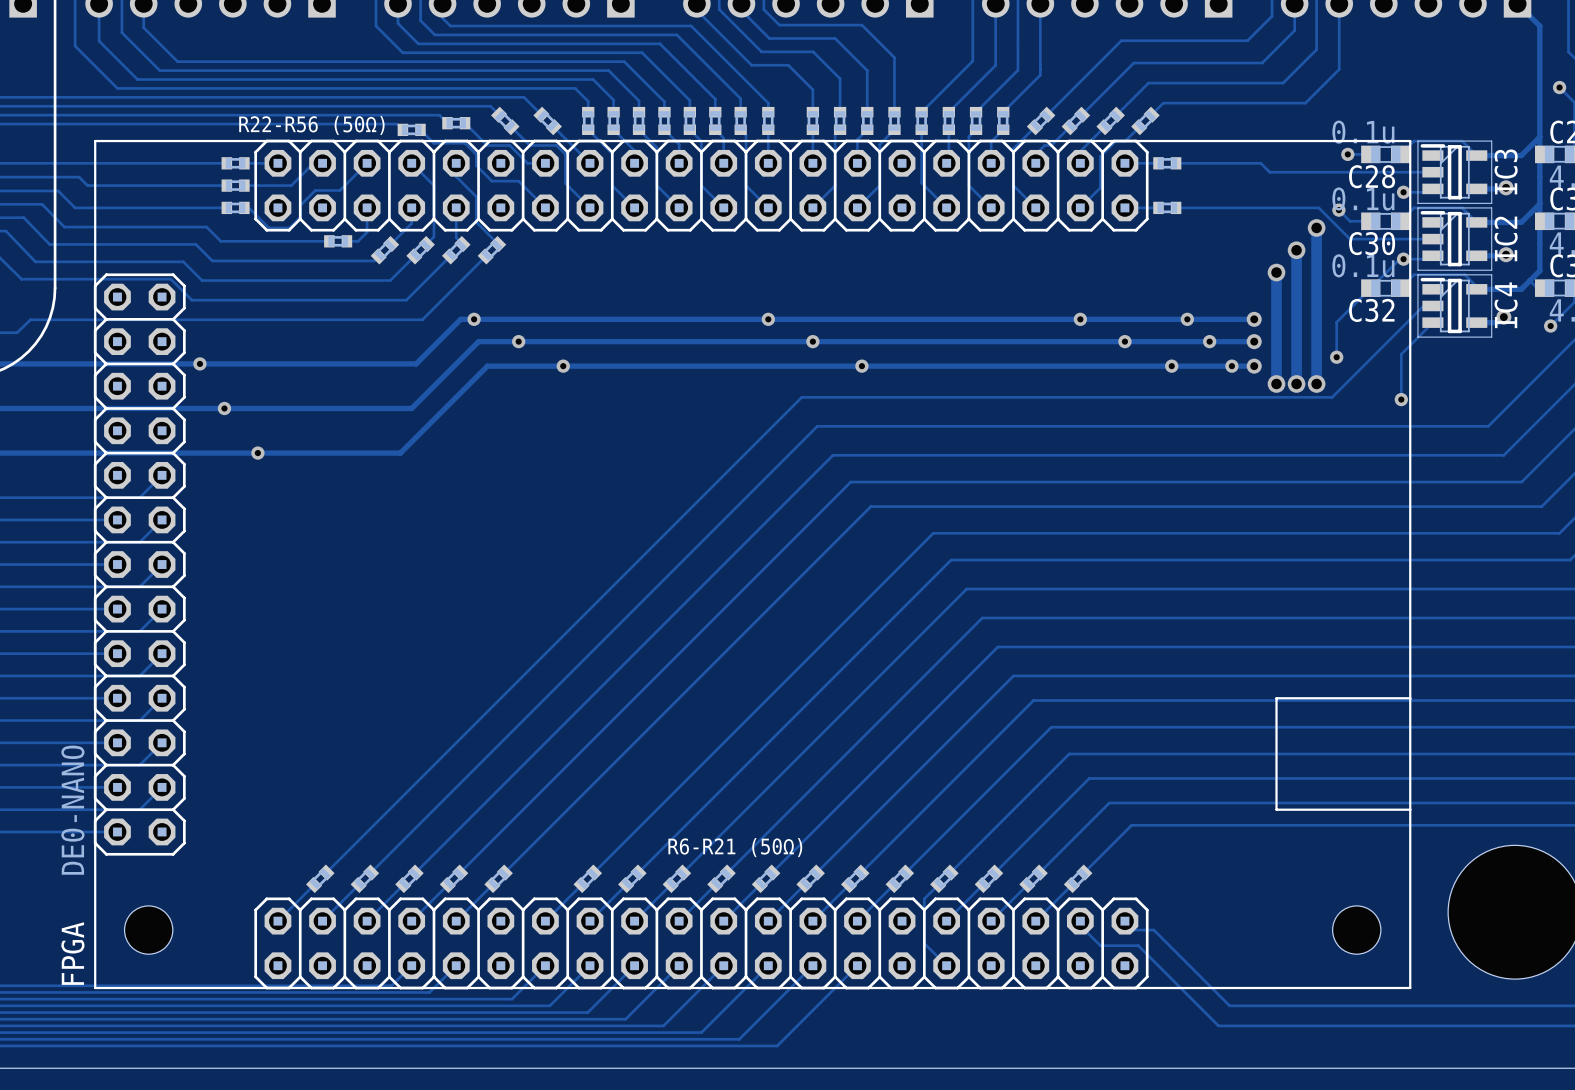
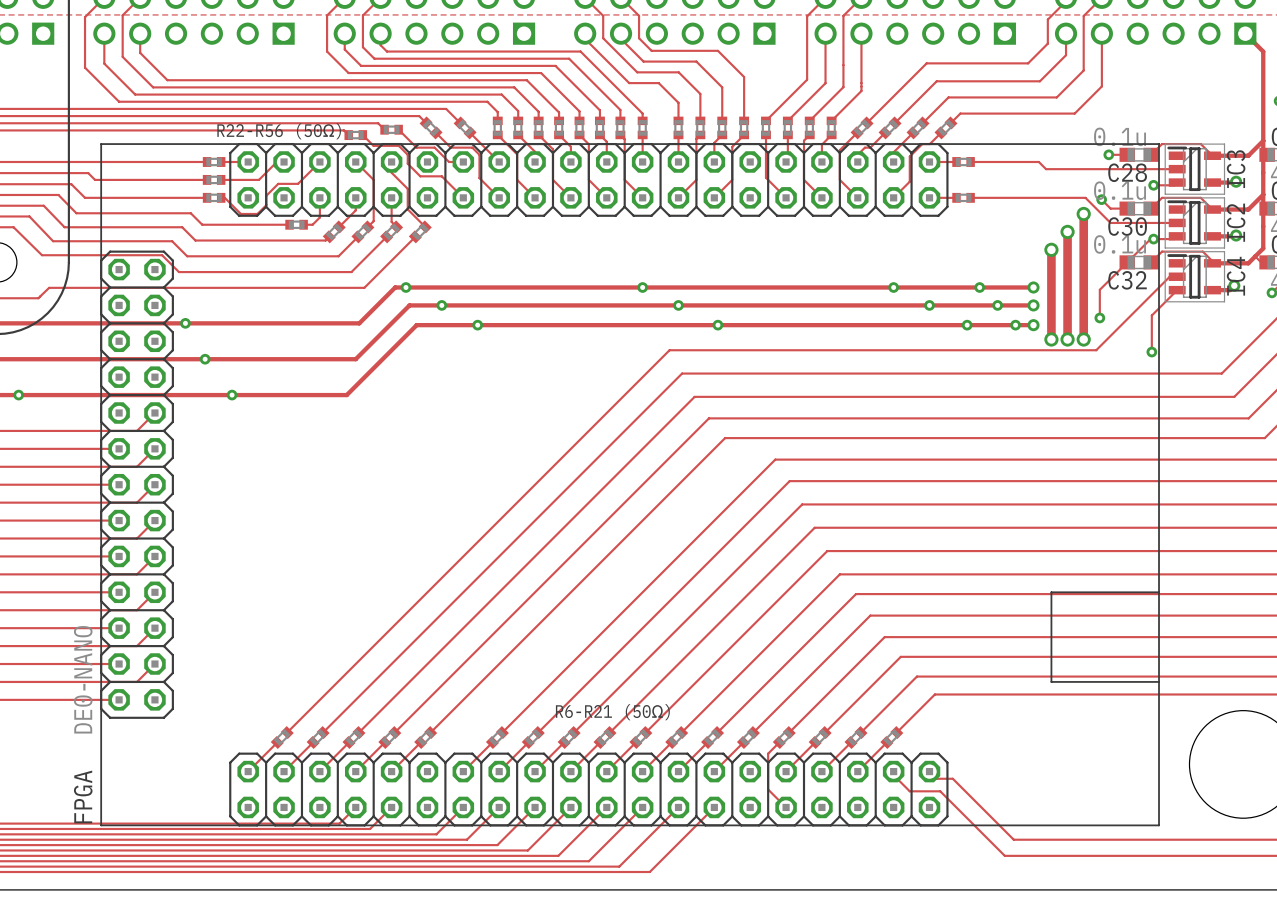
FPGA footprint: [93, 139, 1412, 990] -> [100, 142, 1160, 827]

